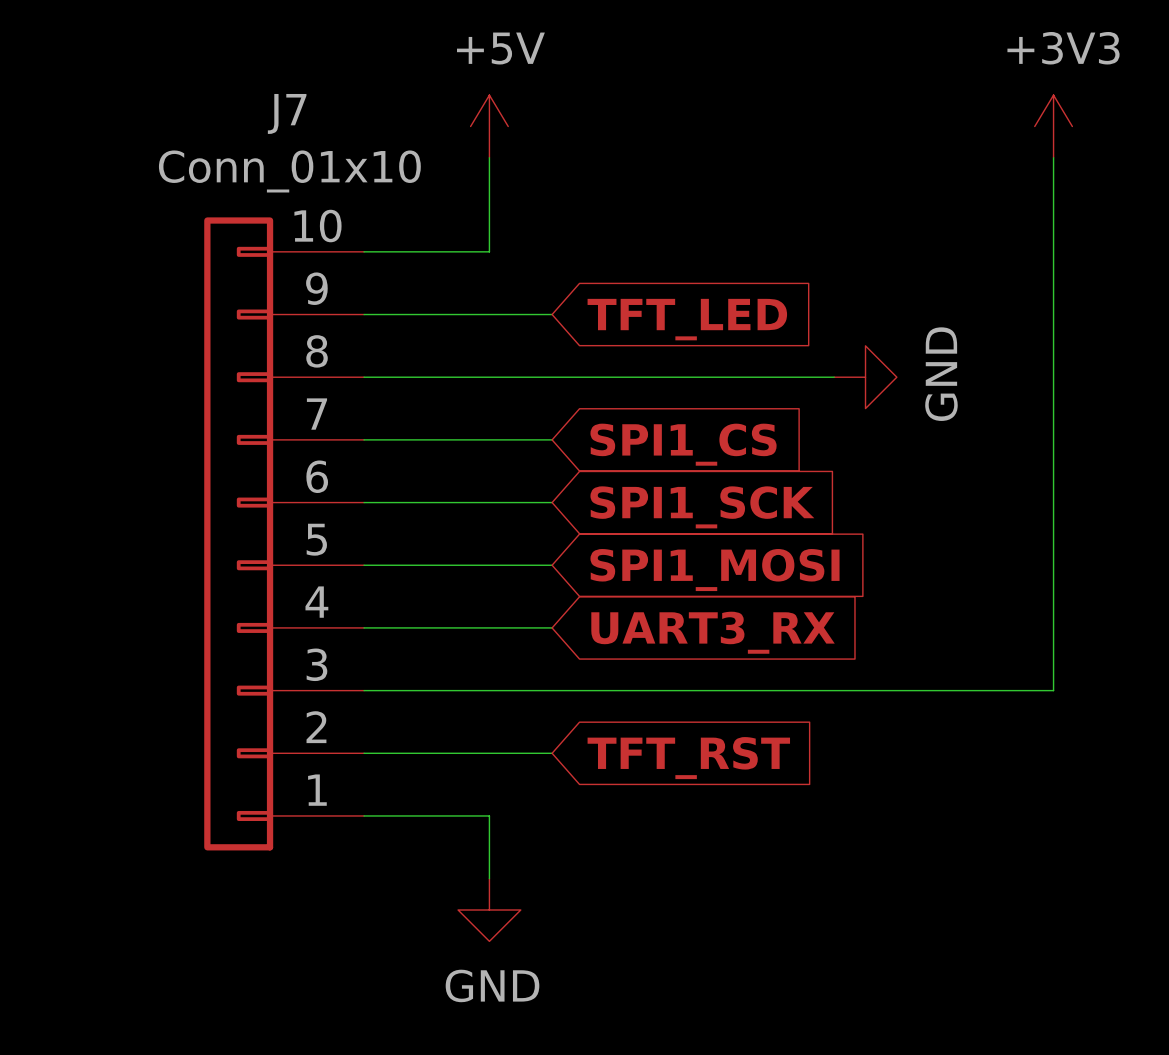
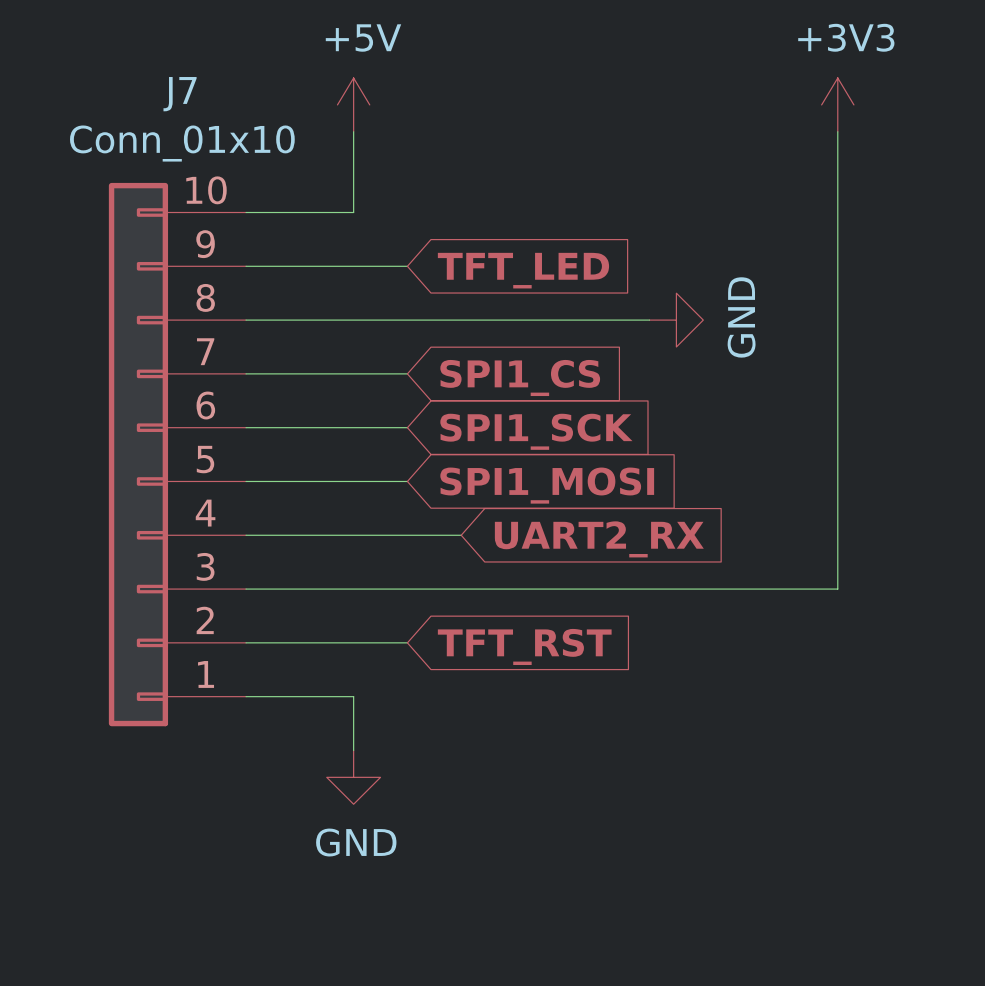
wire: none -> (407, 535) (461, 535)
global label: UART3_RX (713, 632) -> UART2_RX (599, 539)

